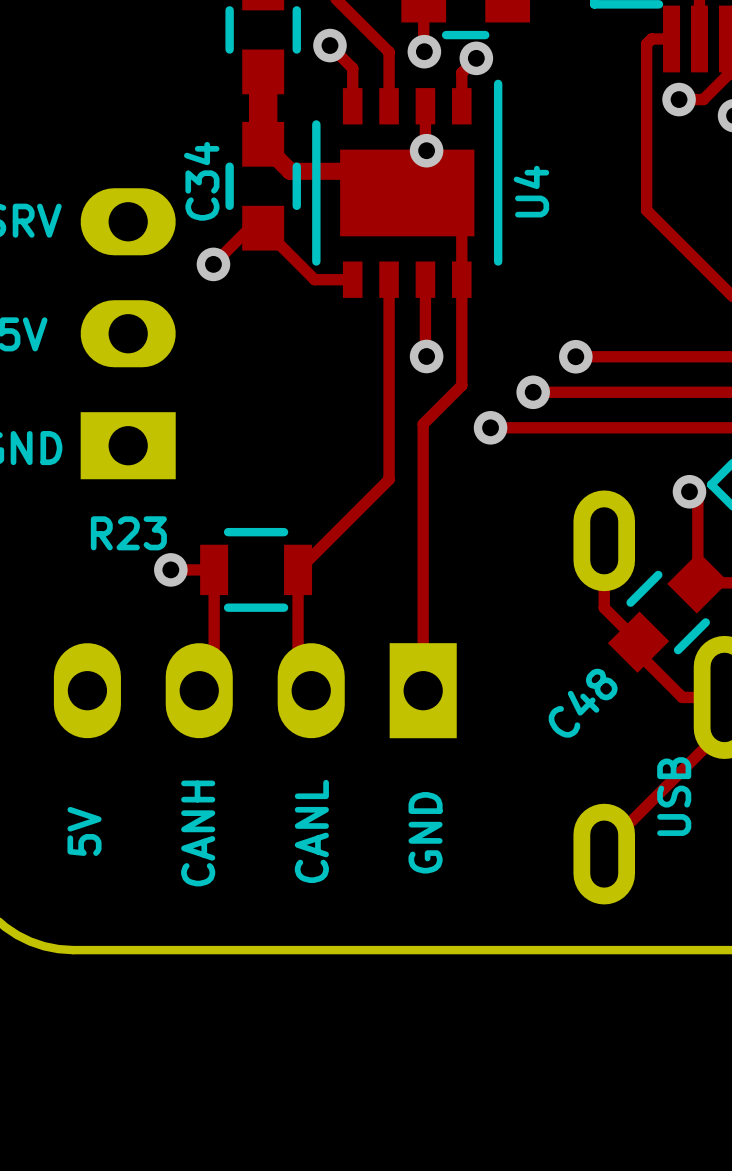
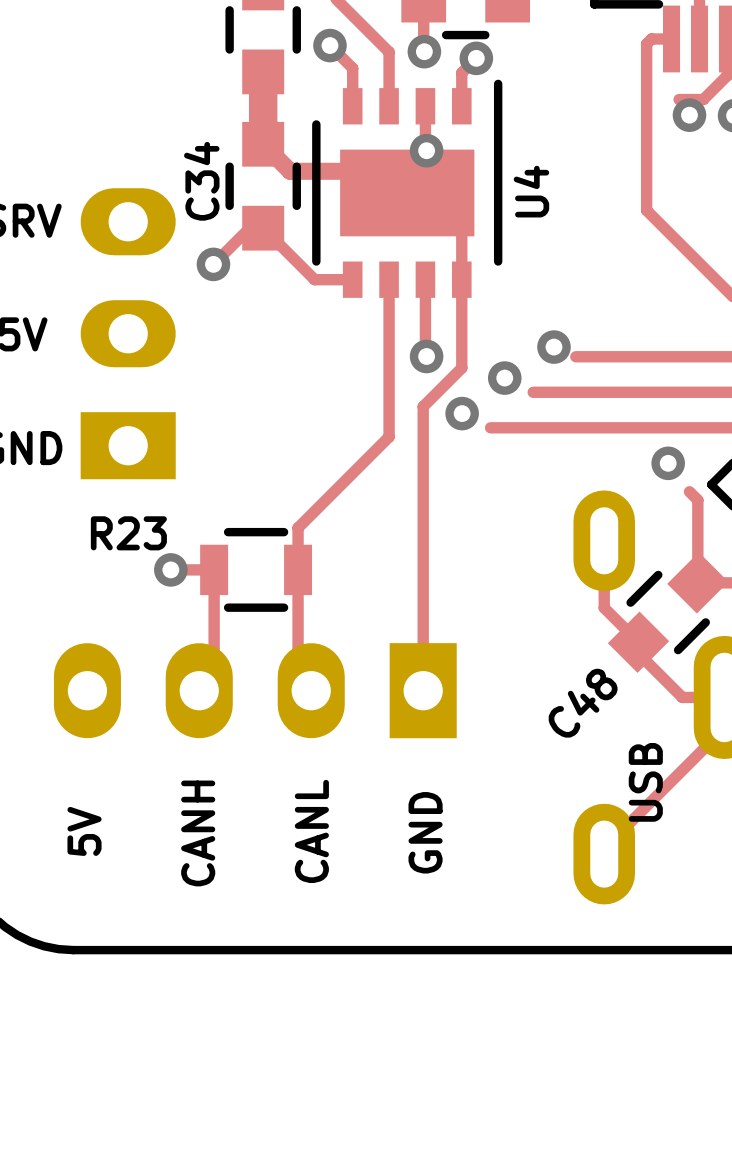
via position: (679, 99) -> (689, 115)
via position: (575, 356) -> (553, 347)
track: (461, 368) (461, 385) (423, 424) -> (461, 368) (423, 406) (423, 424)
via position: (533, 392) -> (504, 378)
via position: (490, 427) -> (462, 413)
track: (389, 436) (389, 479) (298, 570) -> (389, 436) (298, 527) (298, 569)
via position: (689, 491) -> (668, 463)
text position: USB (674, 796) -> USB (645, 782)

